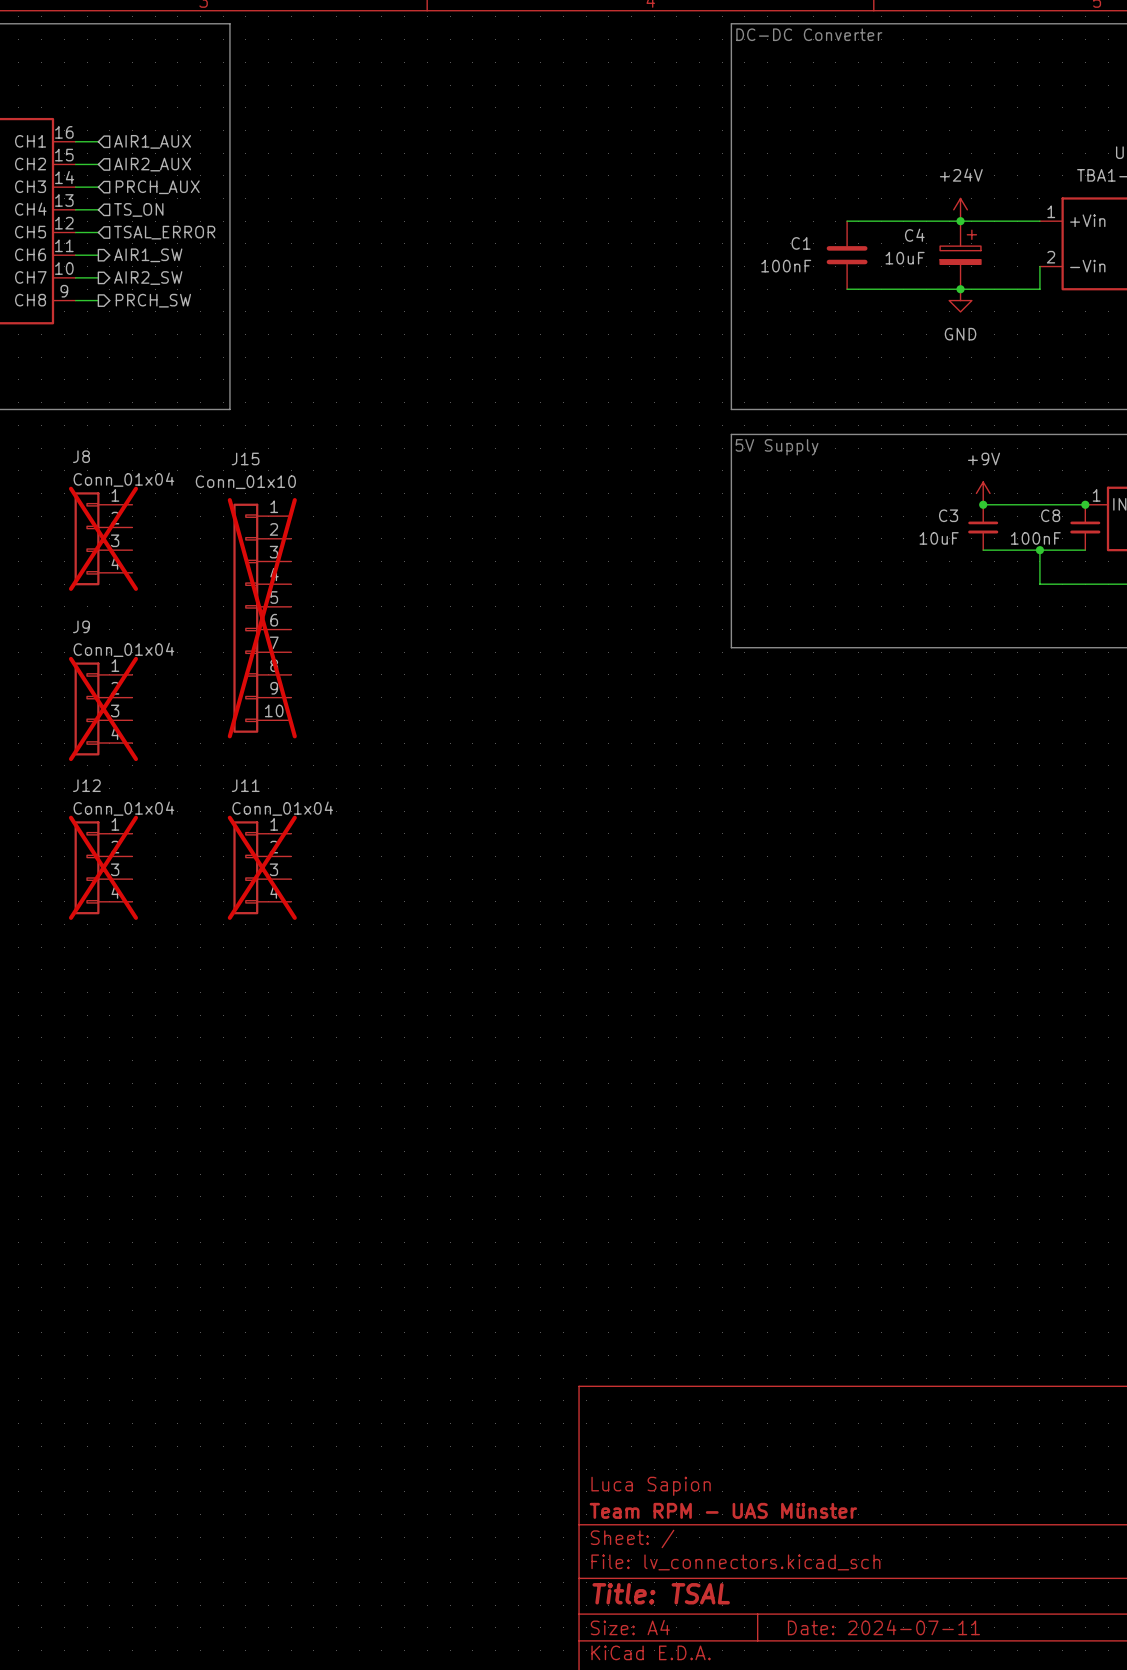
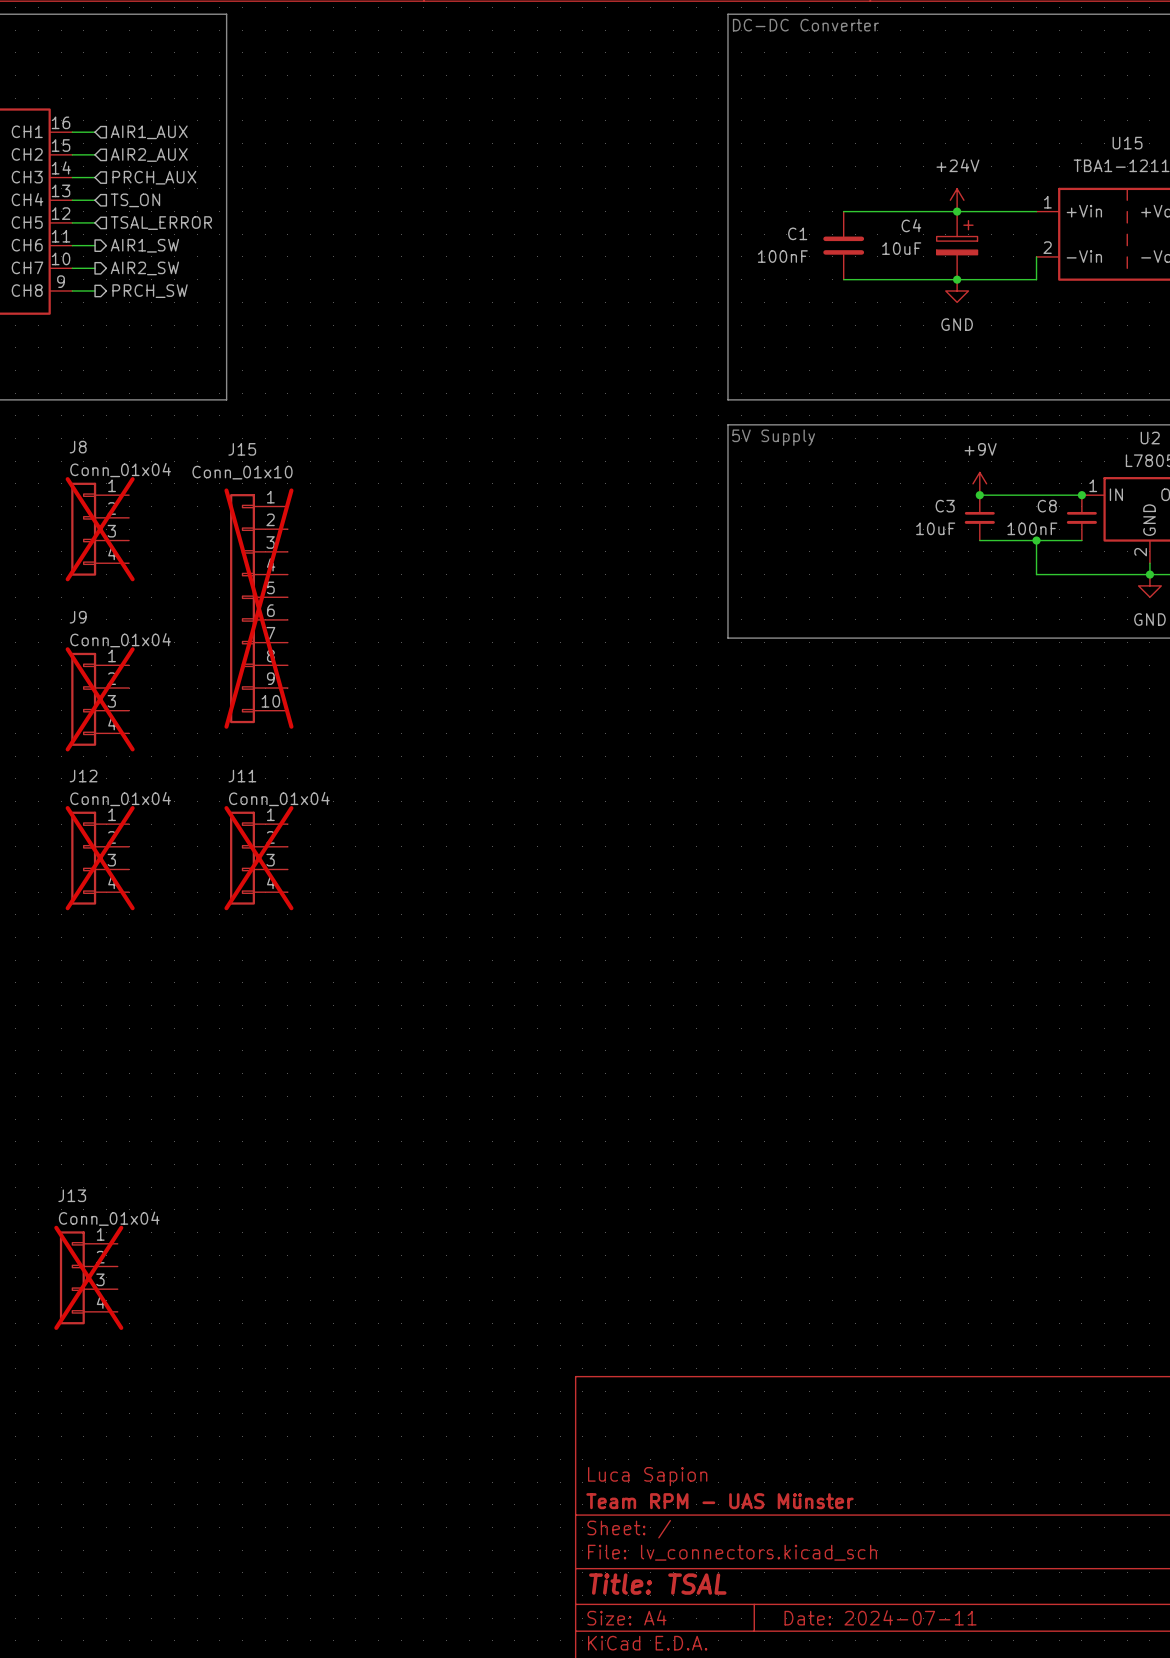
J13: none -> Conn_01x04 (88, 1277)

